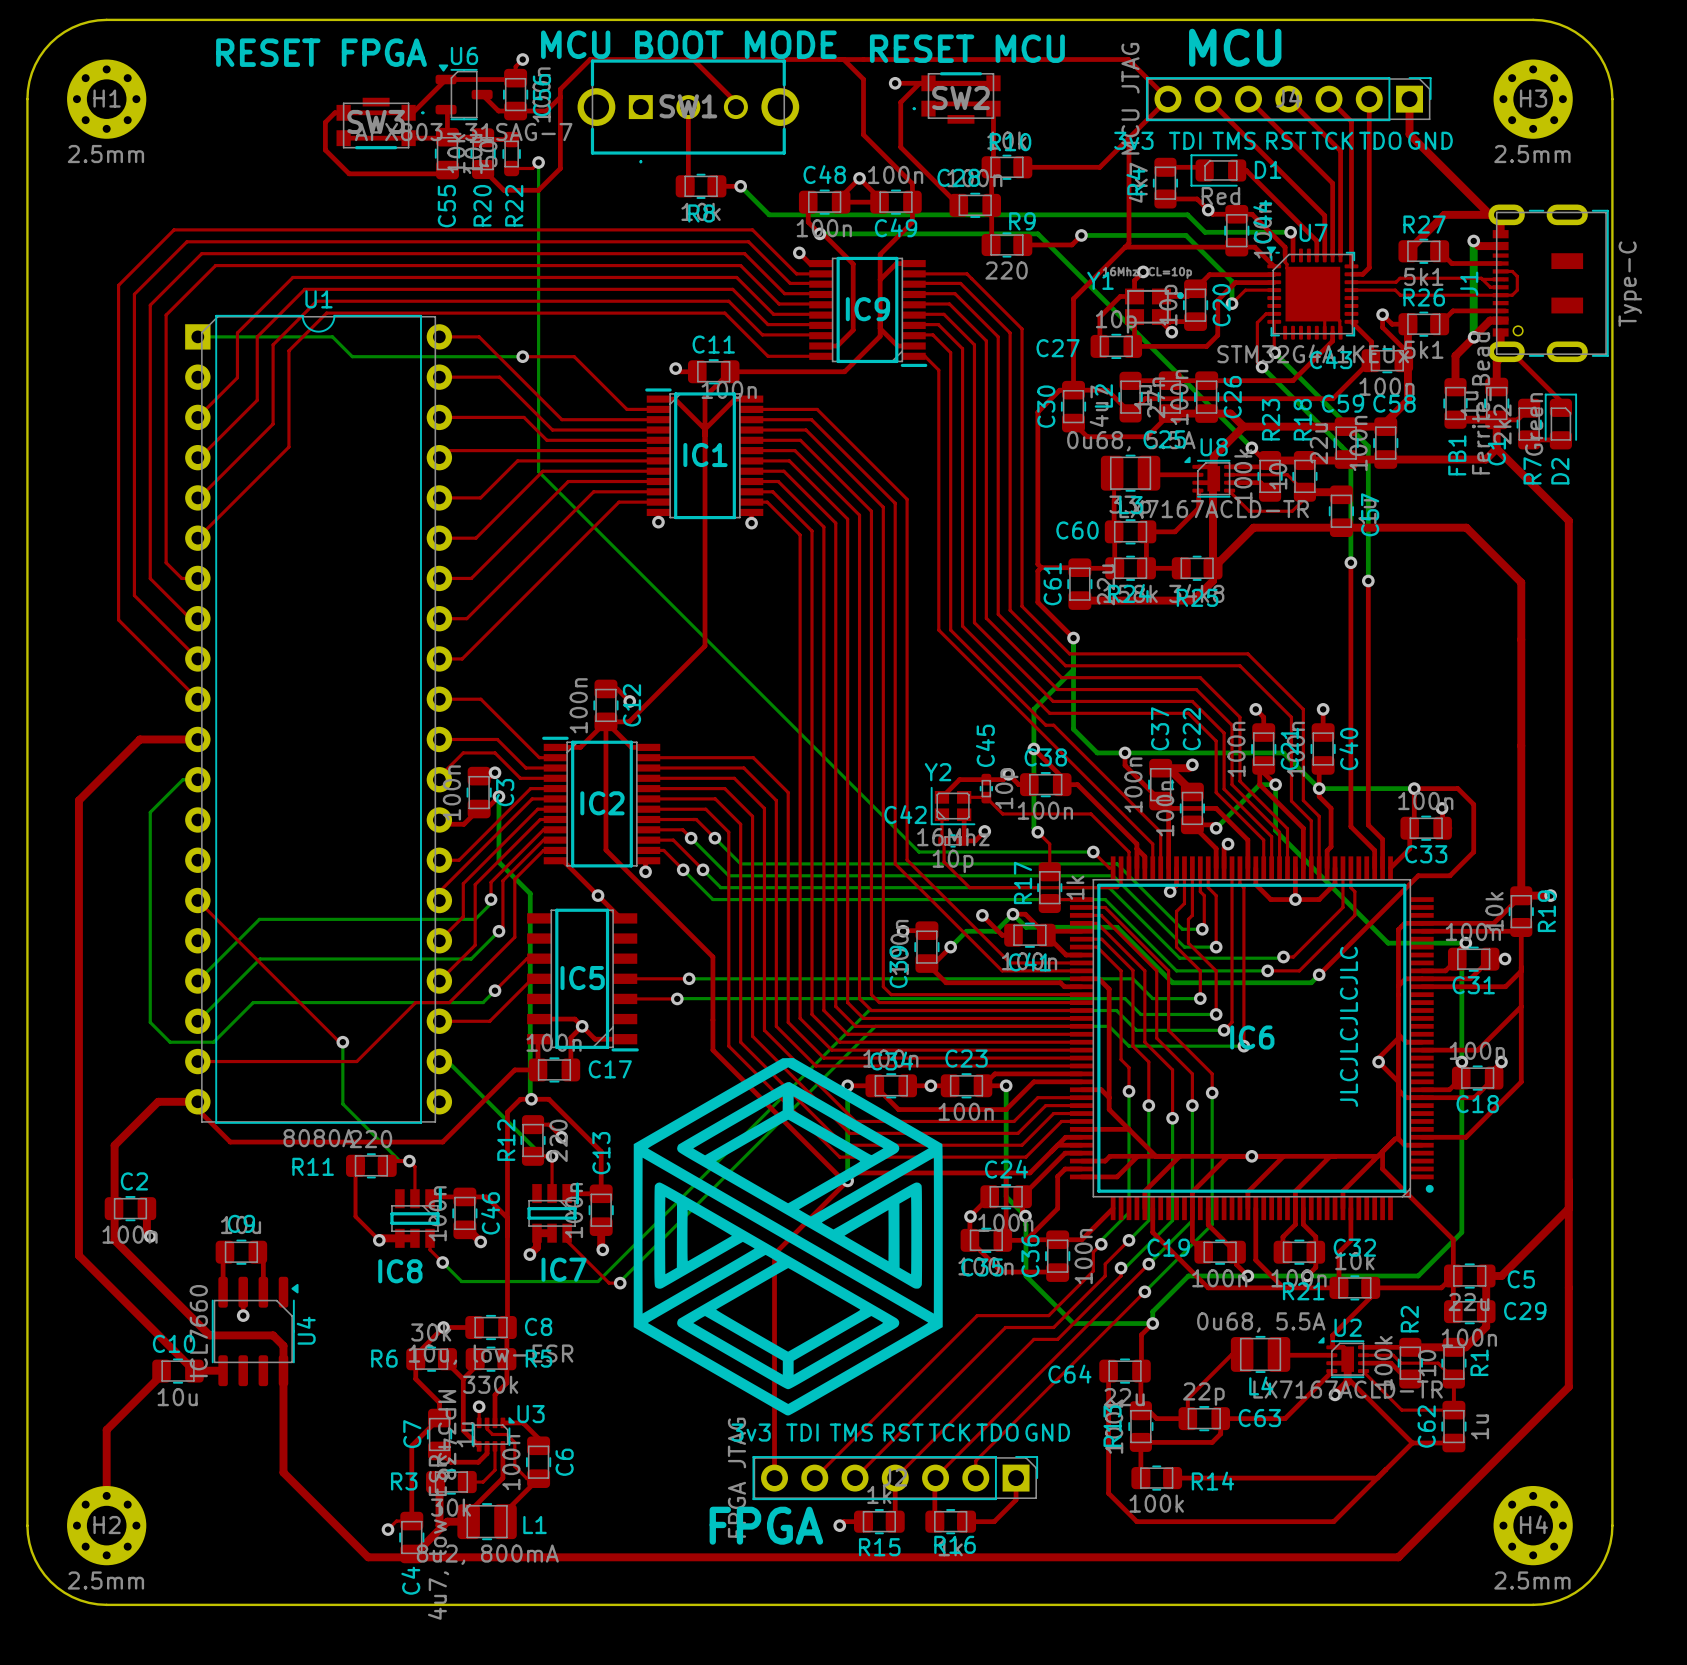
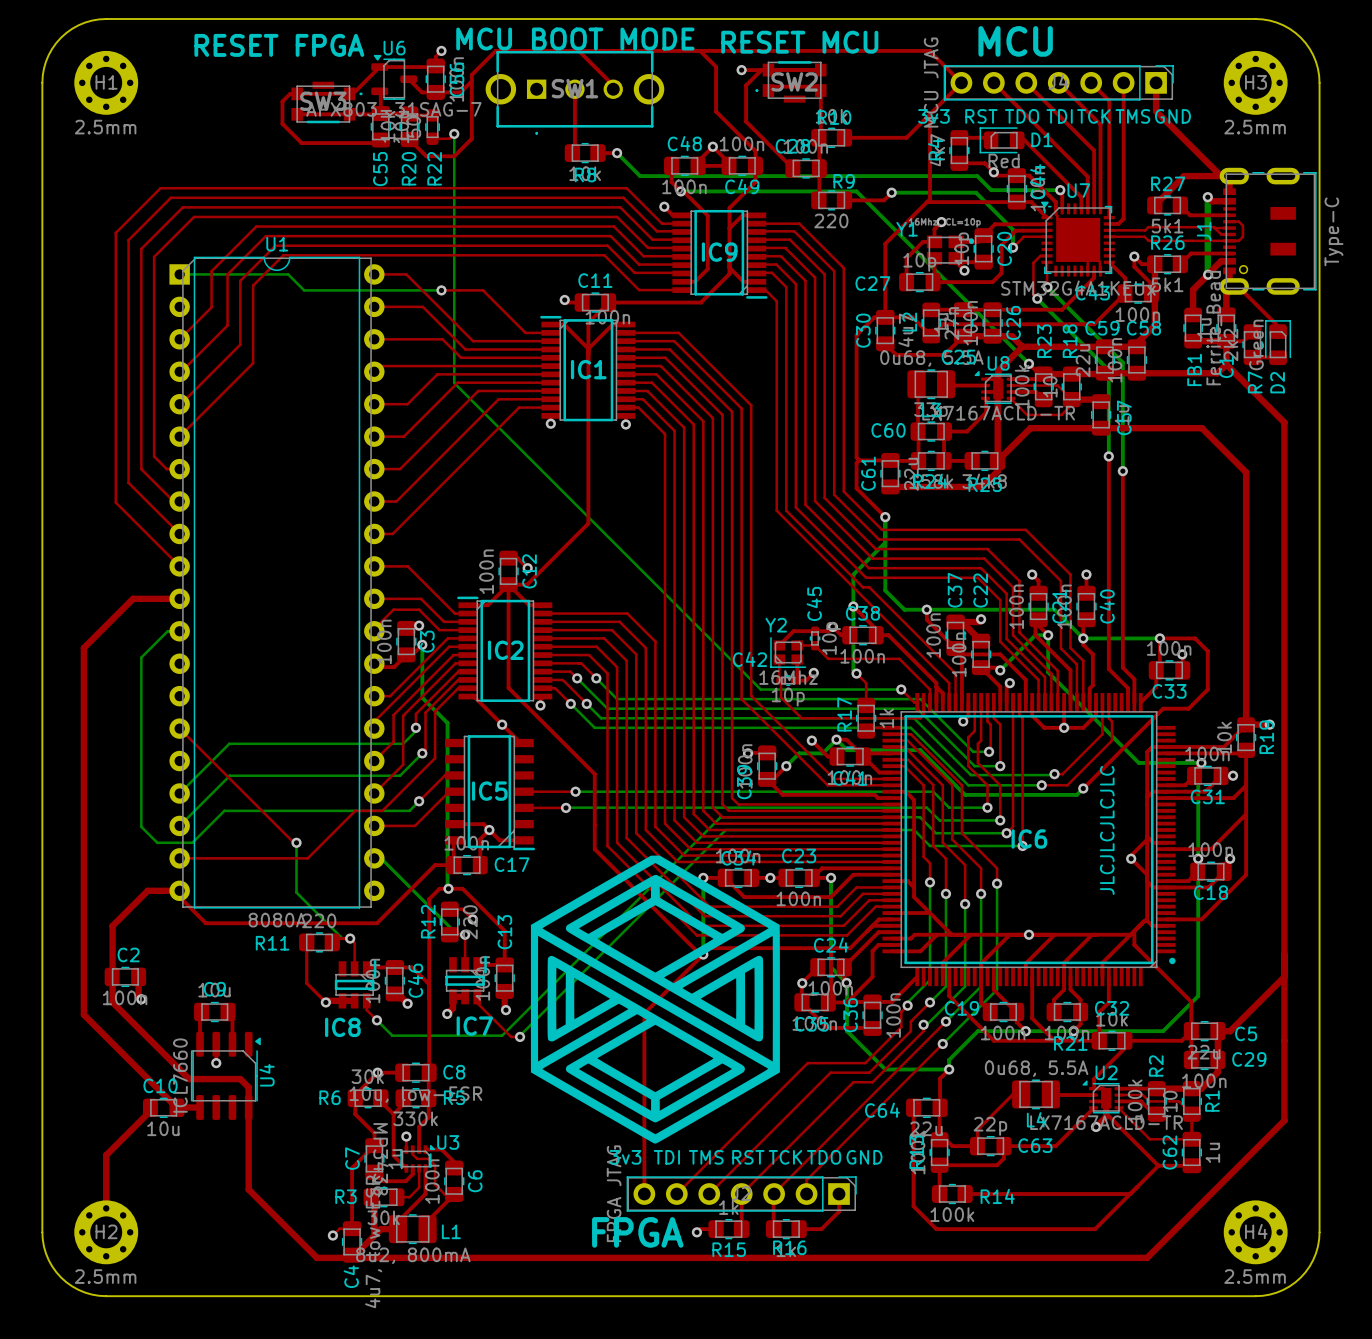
text: TDI (1185, 140) -> RST (981, 116)
text: TMS (1234, 140) -> TDO (1022, 116)
text: RST (1286, 140) -> TDI (1059, 116)
text: TDO (1380, 140) -> TMS (1132, 116)

